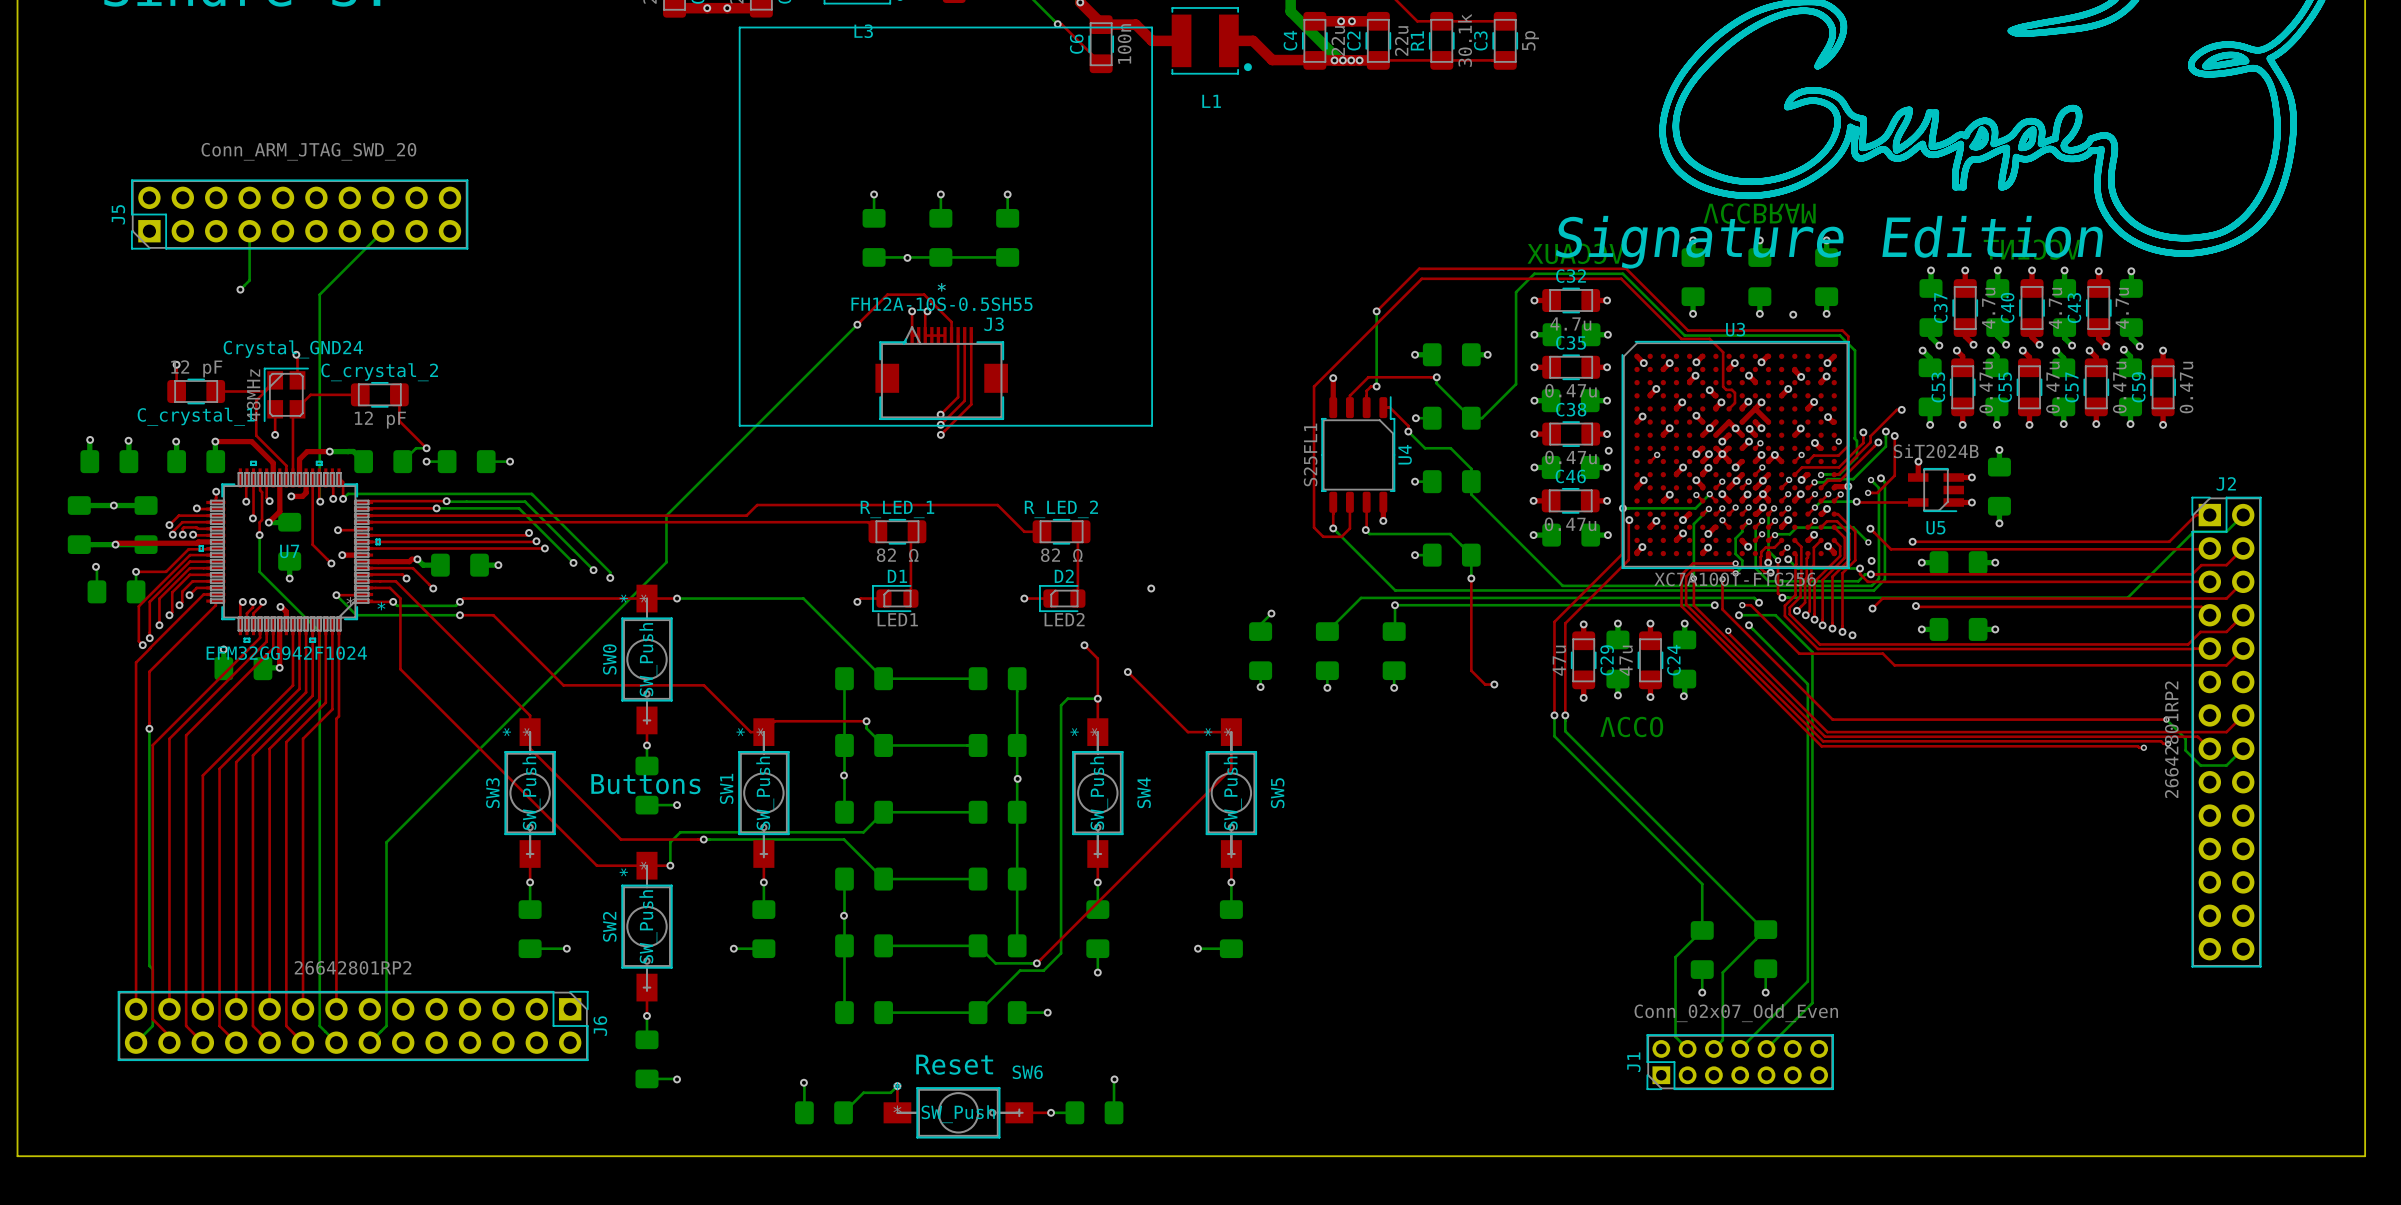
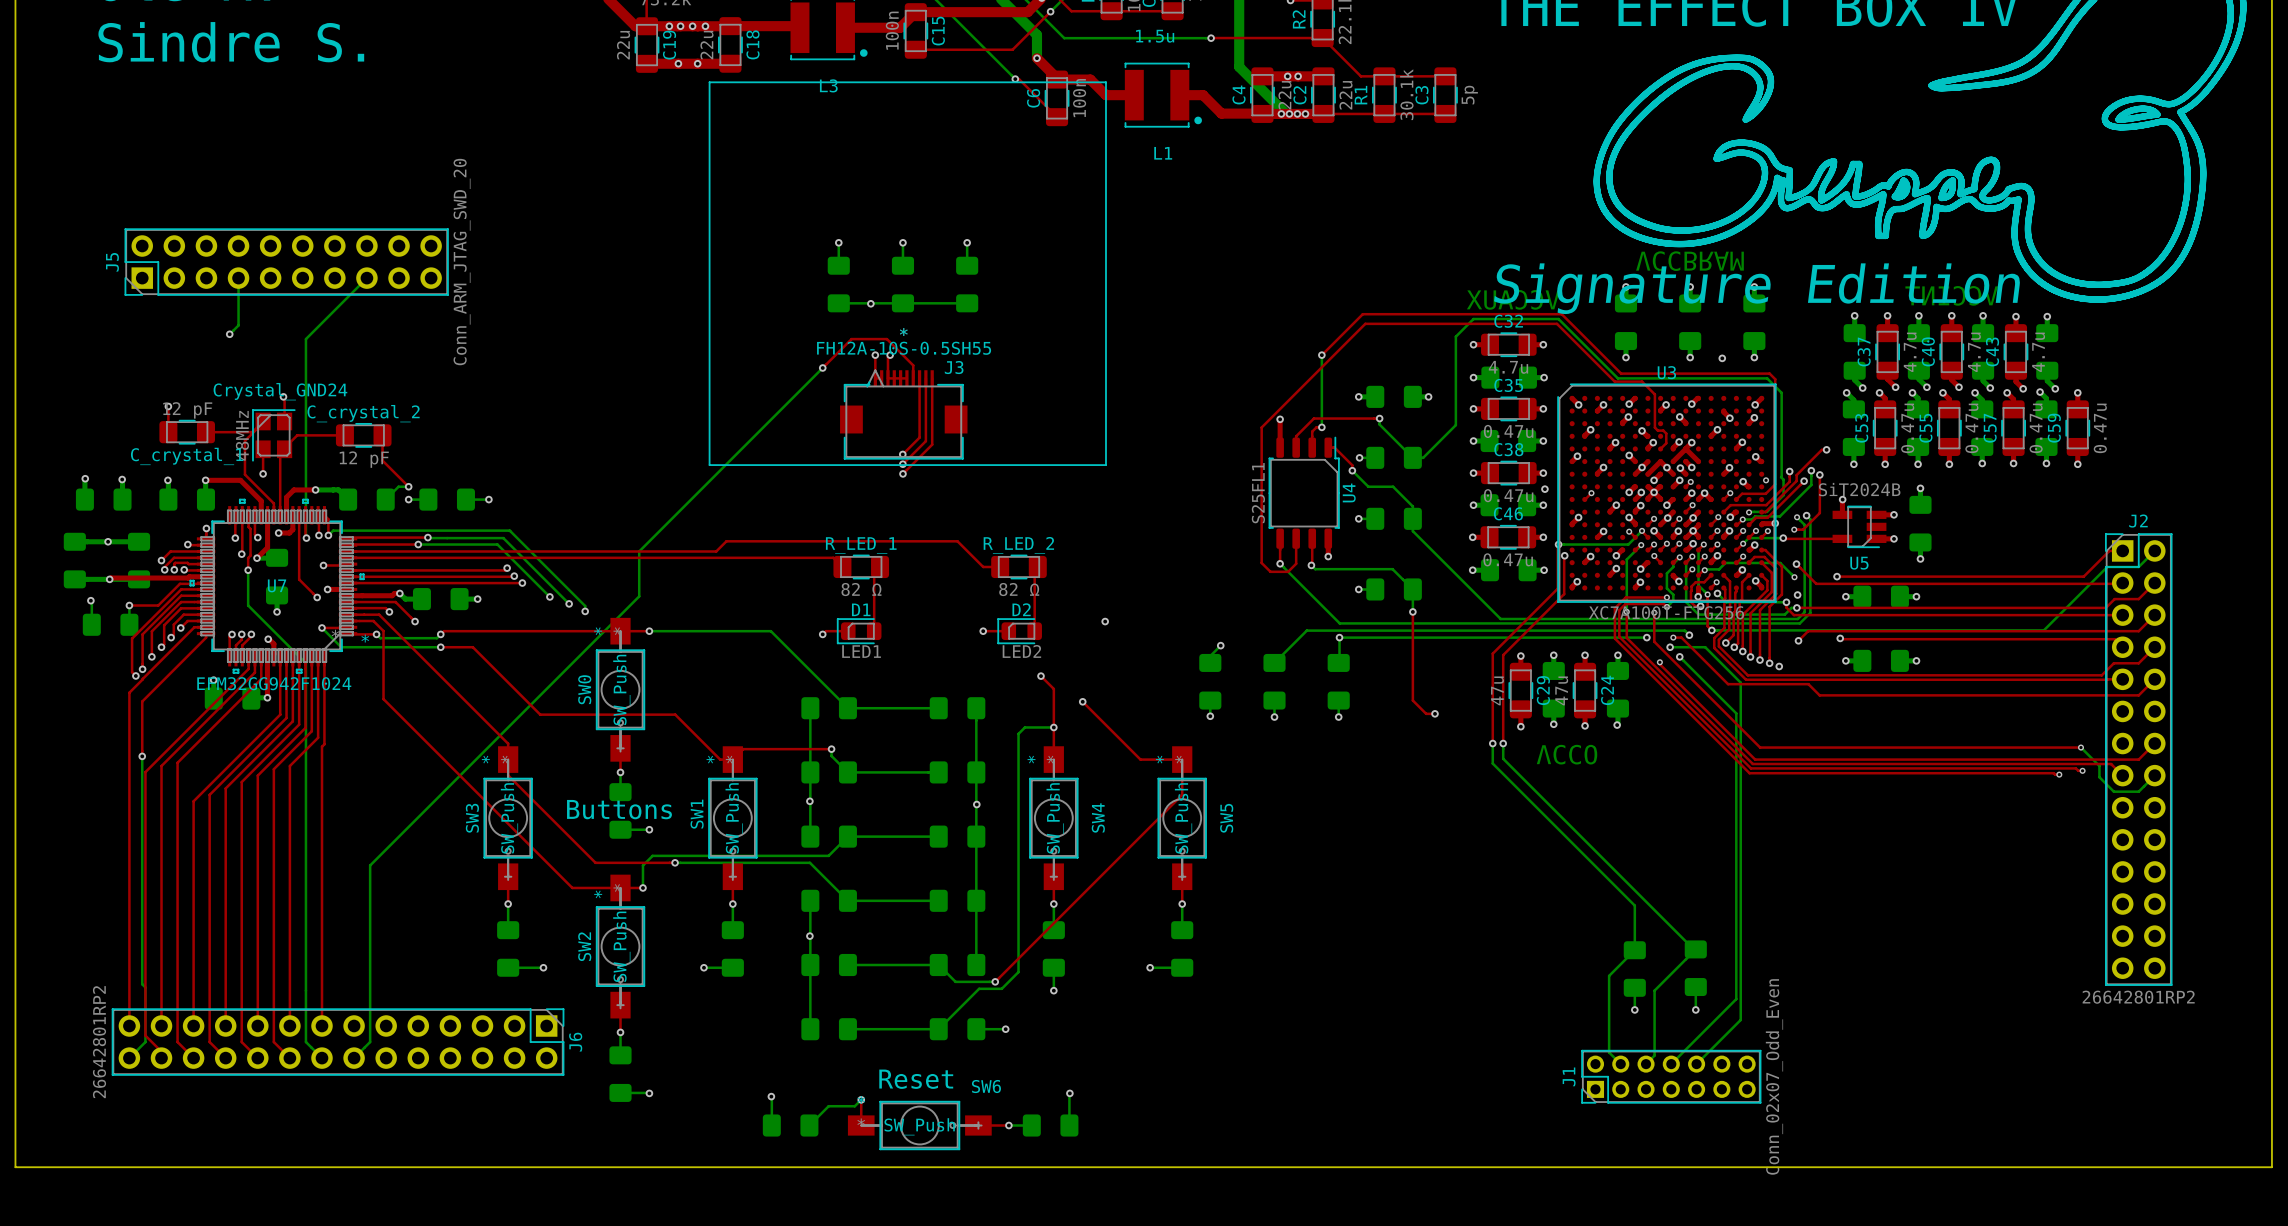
J5 value rotation: 0° (308, 151) -> 90° counterclockwise (462, 262)
J2 value rotation: 0° (2171, 739) -> 90° clockwise (2138, 997)
J2 value position: 26642801RP2 (2171, 739) -> 26642801RP2 (2138, 997)
J6 value rotation: 0° (353, 967) -> 90° counterclockwise (99, 1042)
J6 value position: 26642801RP2 (353, 967) -> 26642801RP2 (99, 1042)
J1 value rotation: 0° (1736, 1013) -> 90° counterclockwise (1774, 1076)

